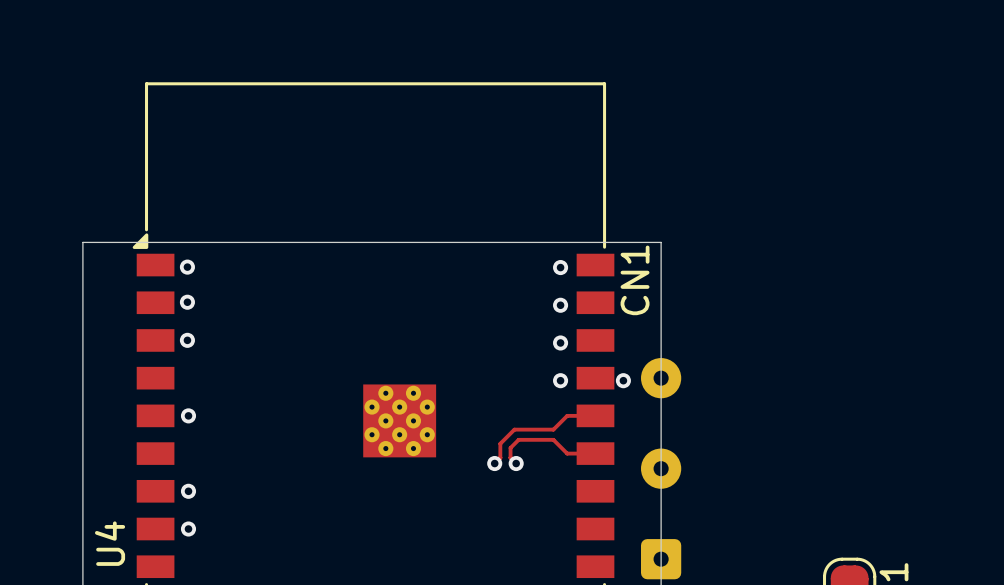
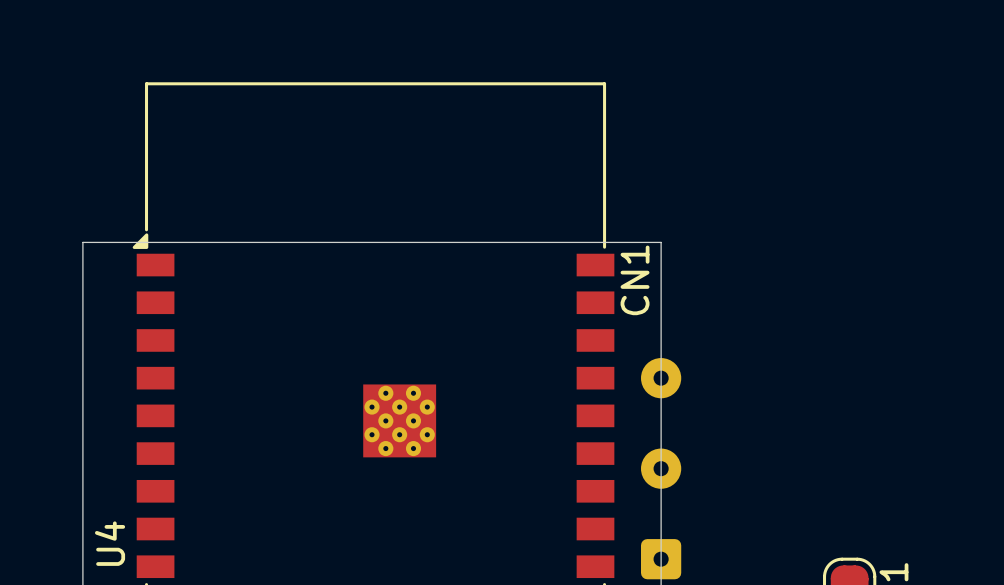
via: (187, 267) -> none
via: (560, 267) -> none
via: (187, 302) -> none
via: (560, 305) -> none
via: (187, 340) -> none
via: (560, 342) -> none
via: (560, 380) -> none
via: (623, 380) -> none
via: (188, 415) -> none
track: (595, 415) (567, 415) (553, 429) (514, 429) (500, 443) (500, 457) -> none
track: (595, 453) (567, 453) (553, 439) (518, 439) (510, 447) (510, 457) -> none
via: (494, 463) -> none
via: (516, 463) -> none
via: (188, 491) -> none
via: (188, 529) -> none

